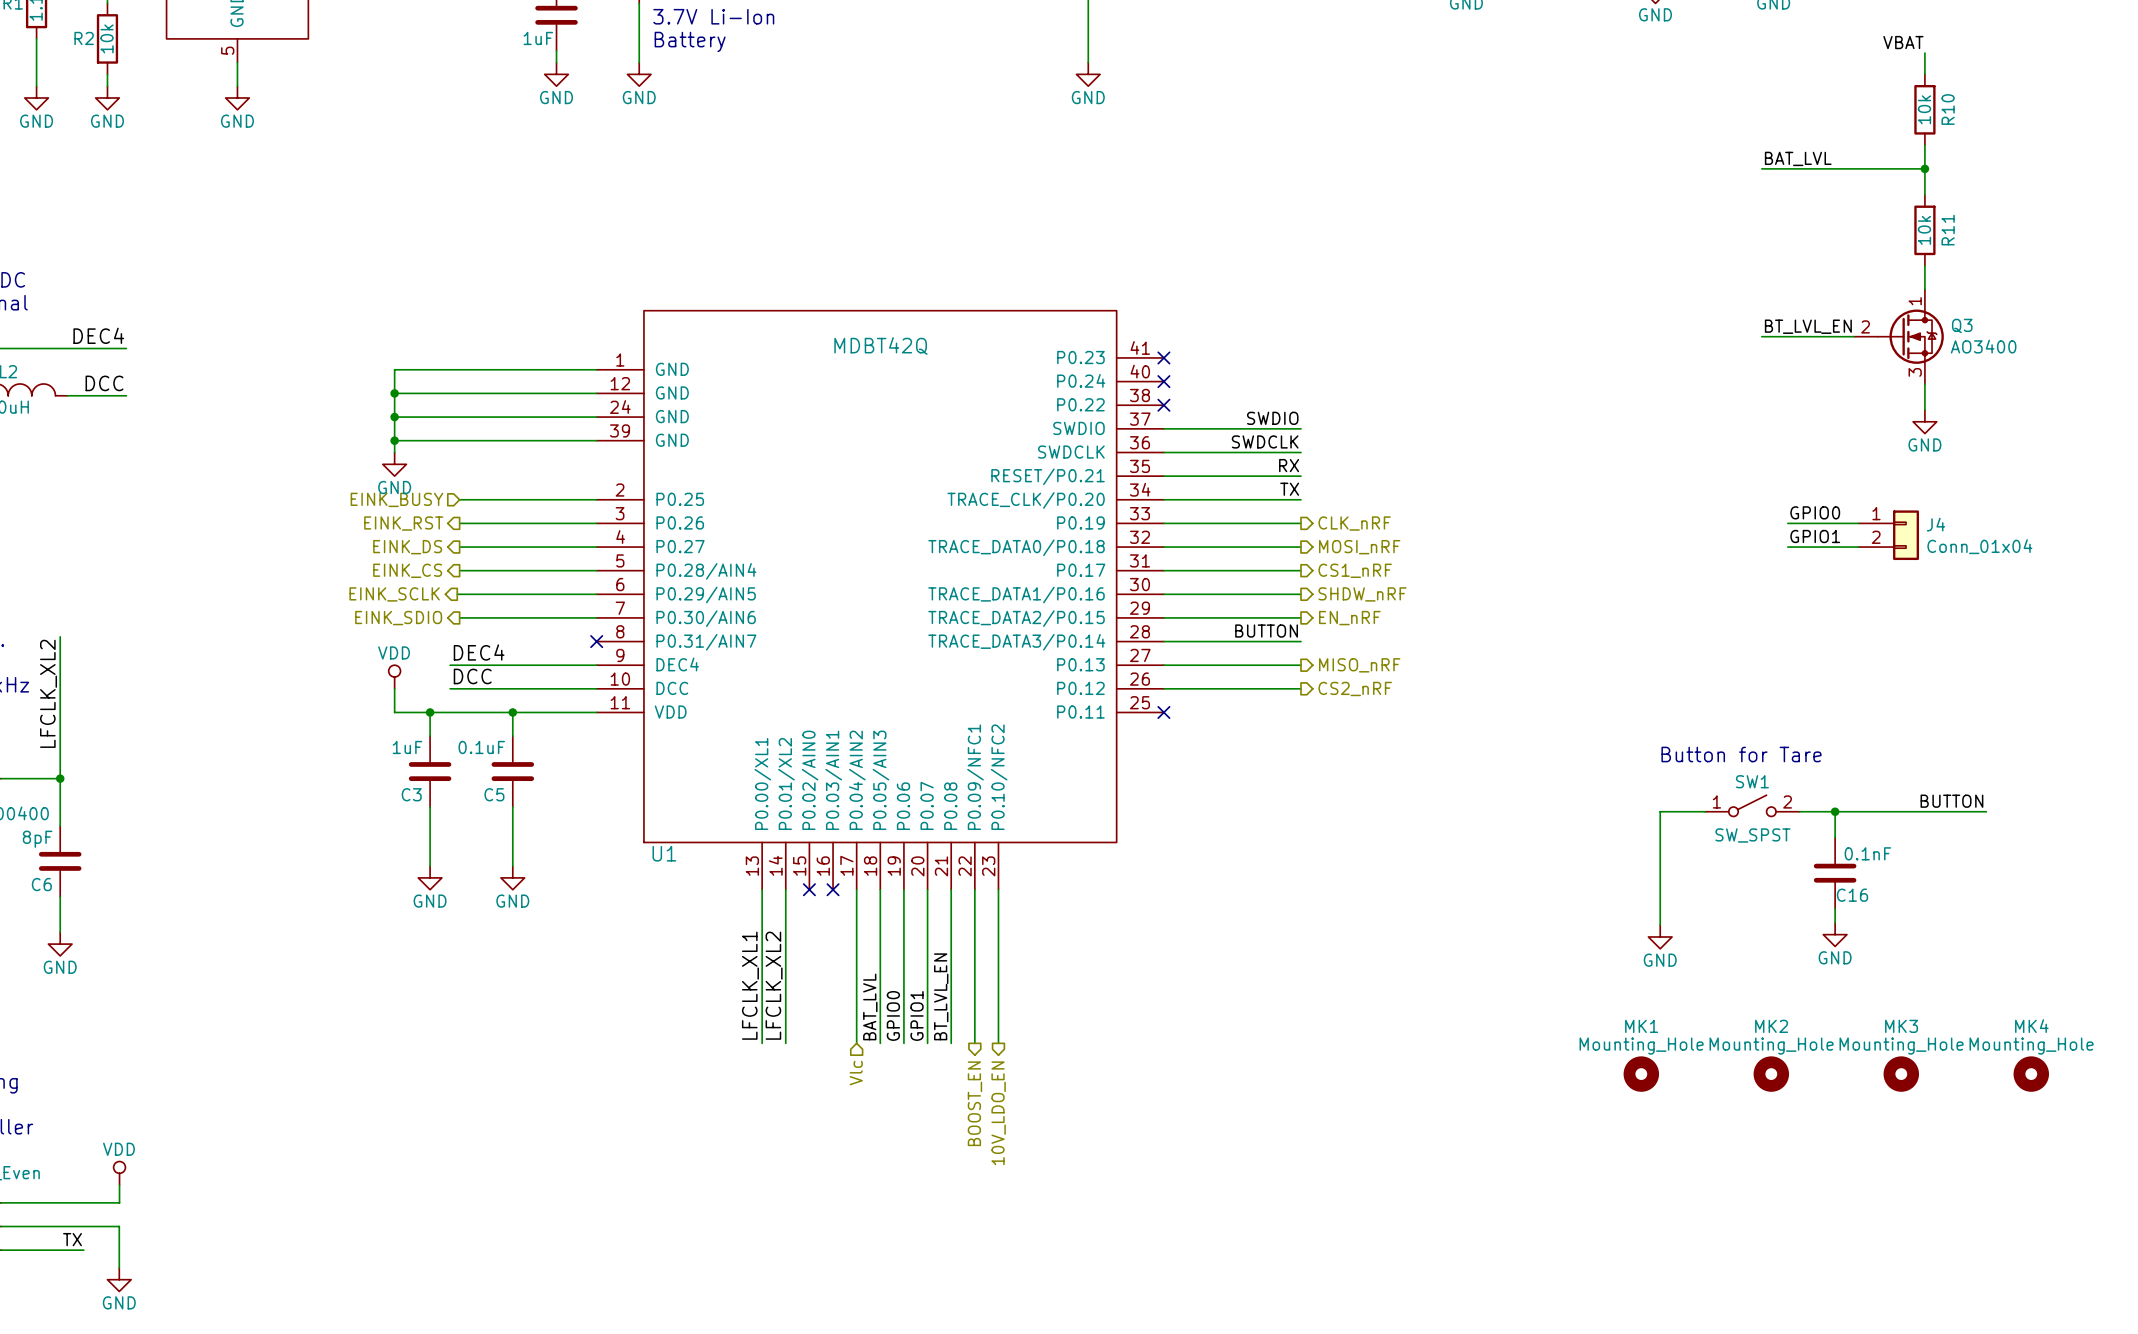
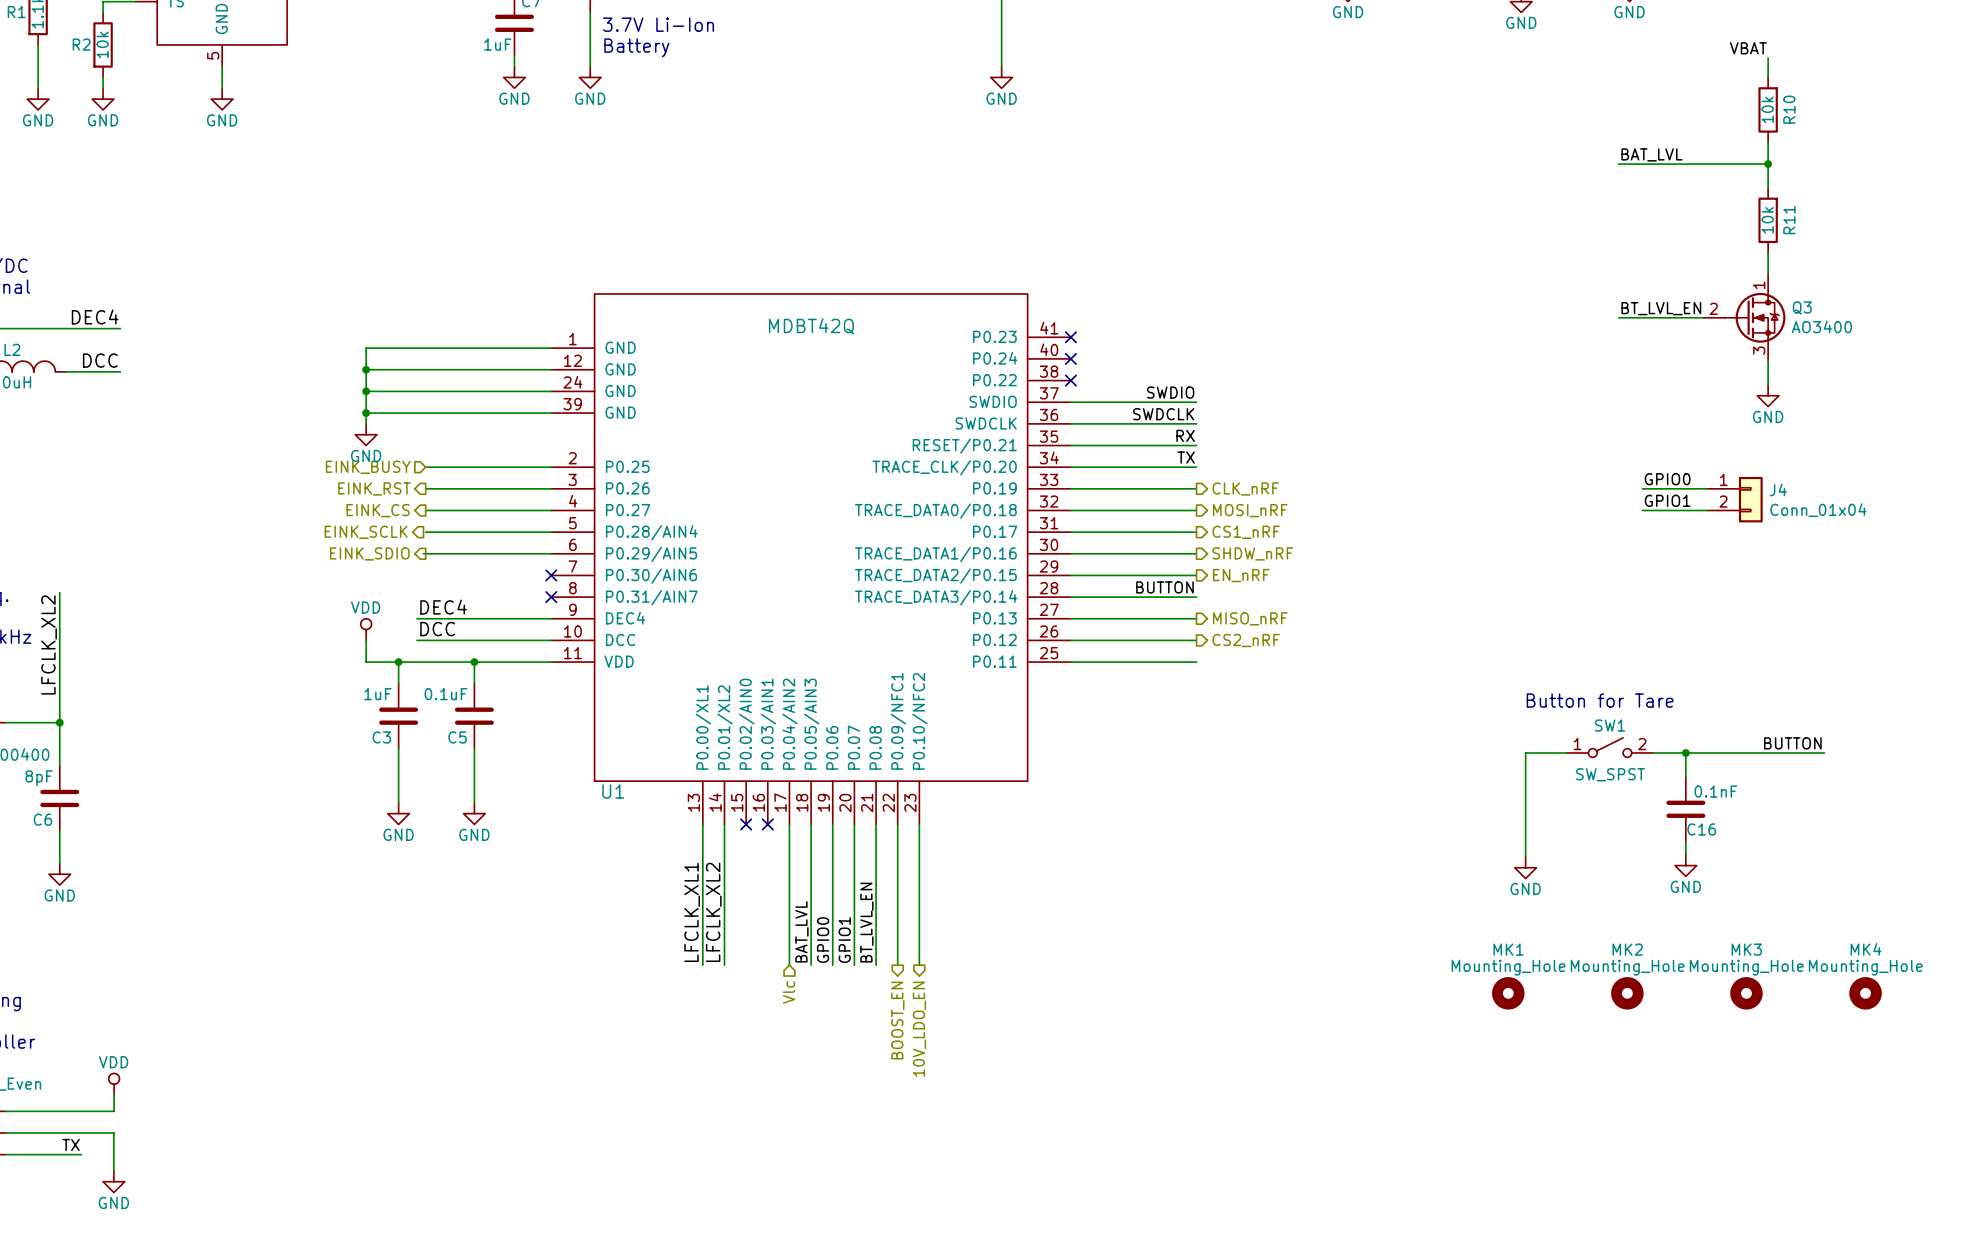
hierarchical label: EINK_DS (407, 547) -> EINK_CS (378, 510)
hierarchical label: EINK_CS (407, 570) -> EINK_SCLK (366, 532)
hierarchical label: EINK_SCLK (394, 594) -> EINK_SDIO (369, 553)
wire: (459, 617) (596, 617) -> none
no-connect mark: none -> (551, 575)
hierarchical label: EINK_SDIO (398, 618) -> none
wire: none -> (1070, 662) (1196, 662)
no-connect mark: (1163, 712) -> none

